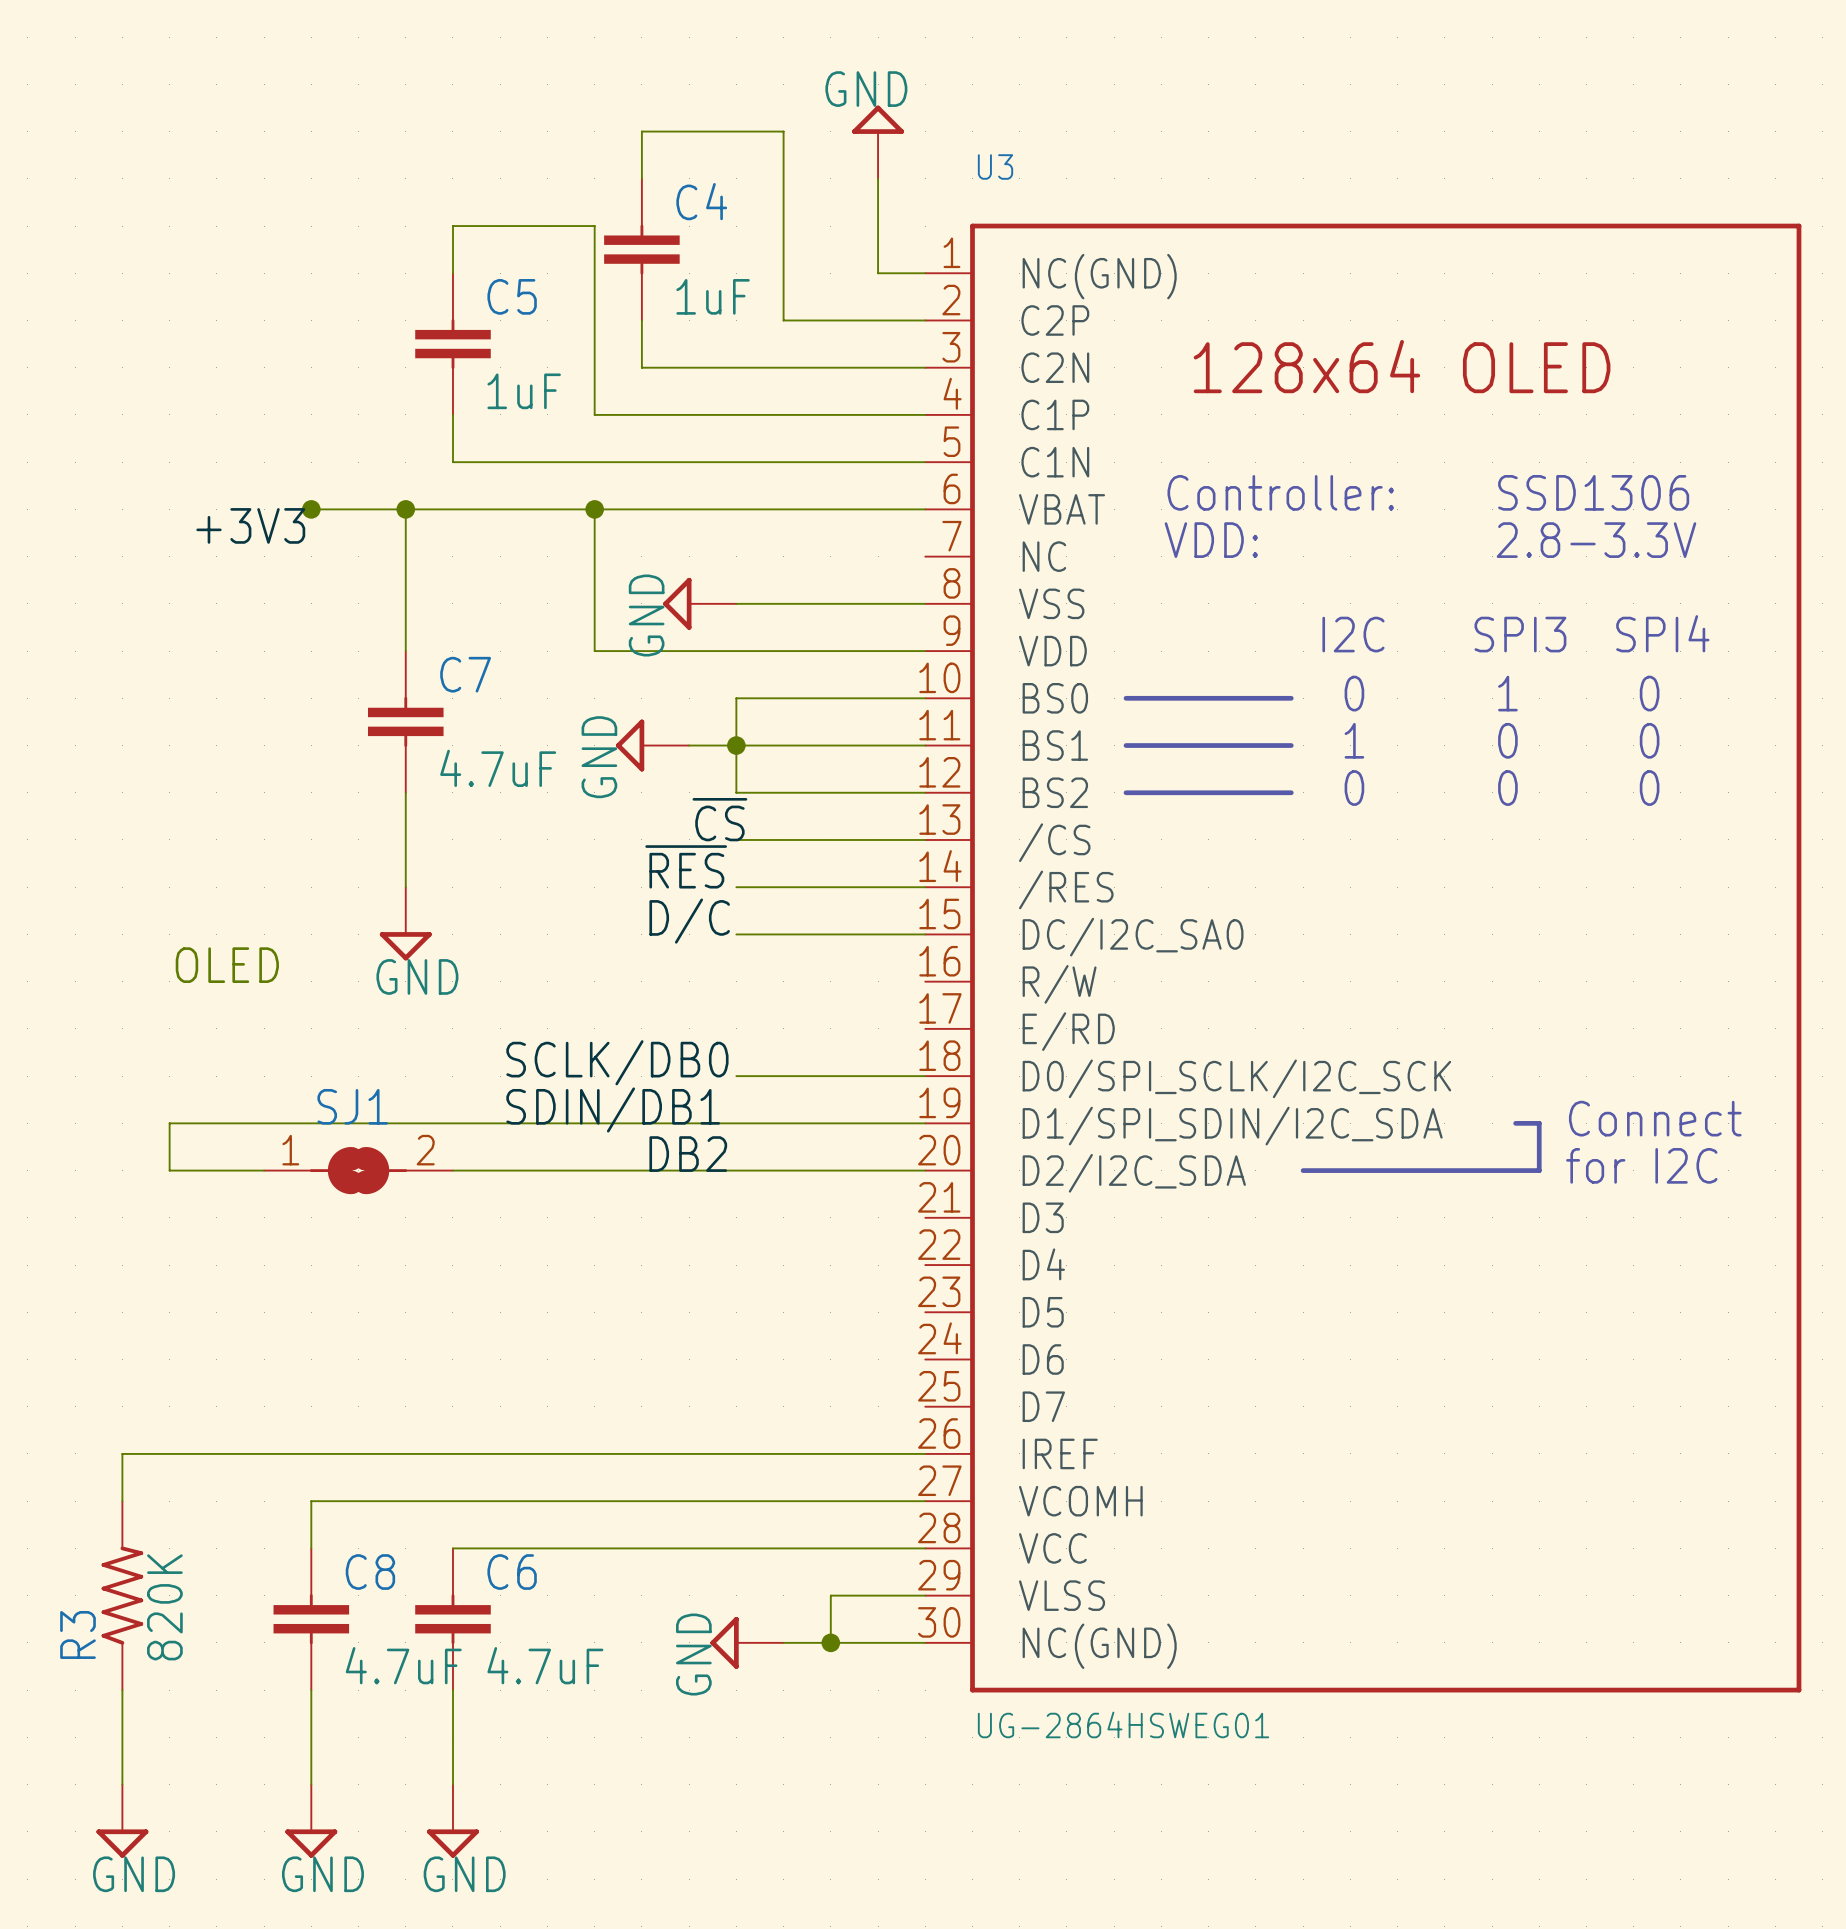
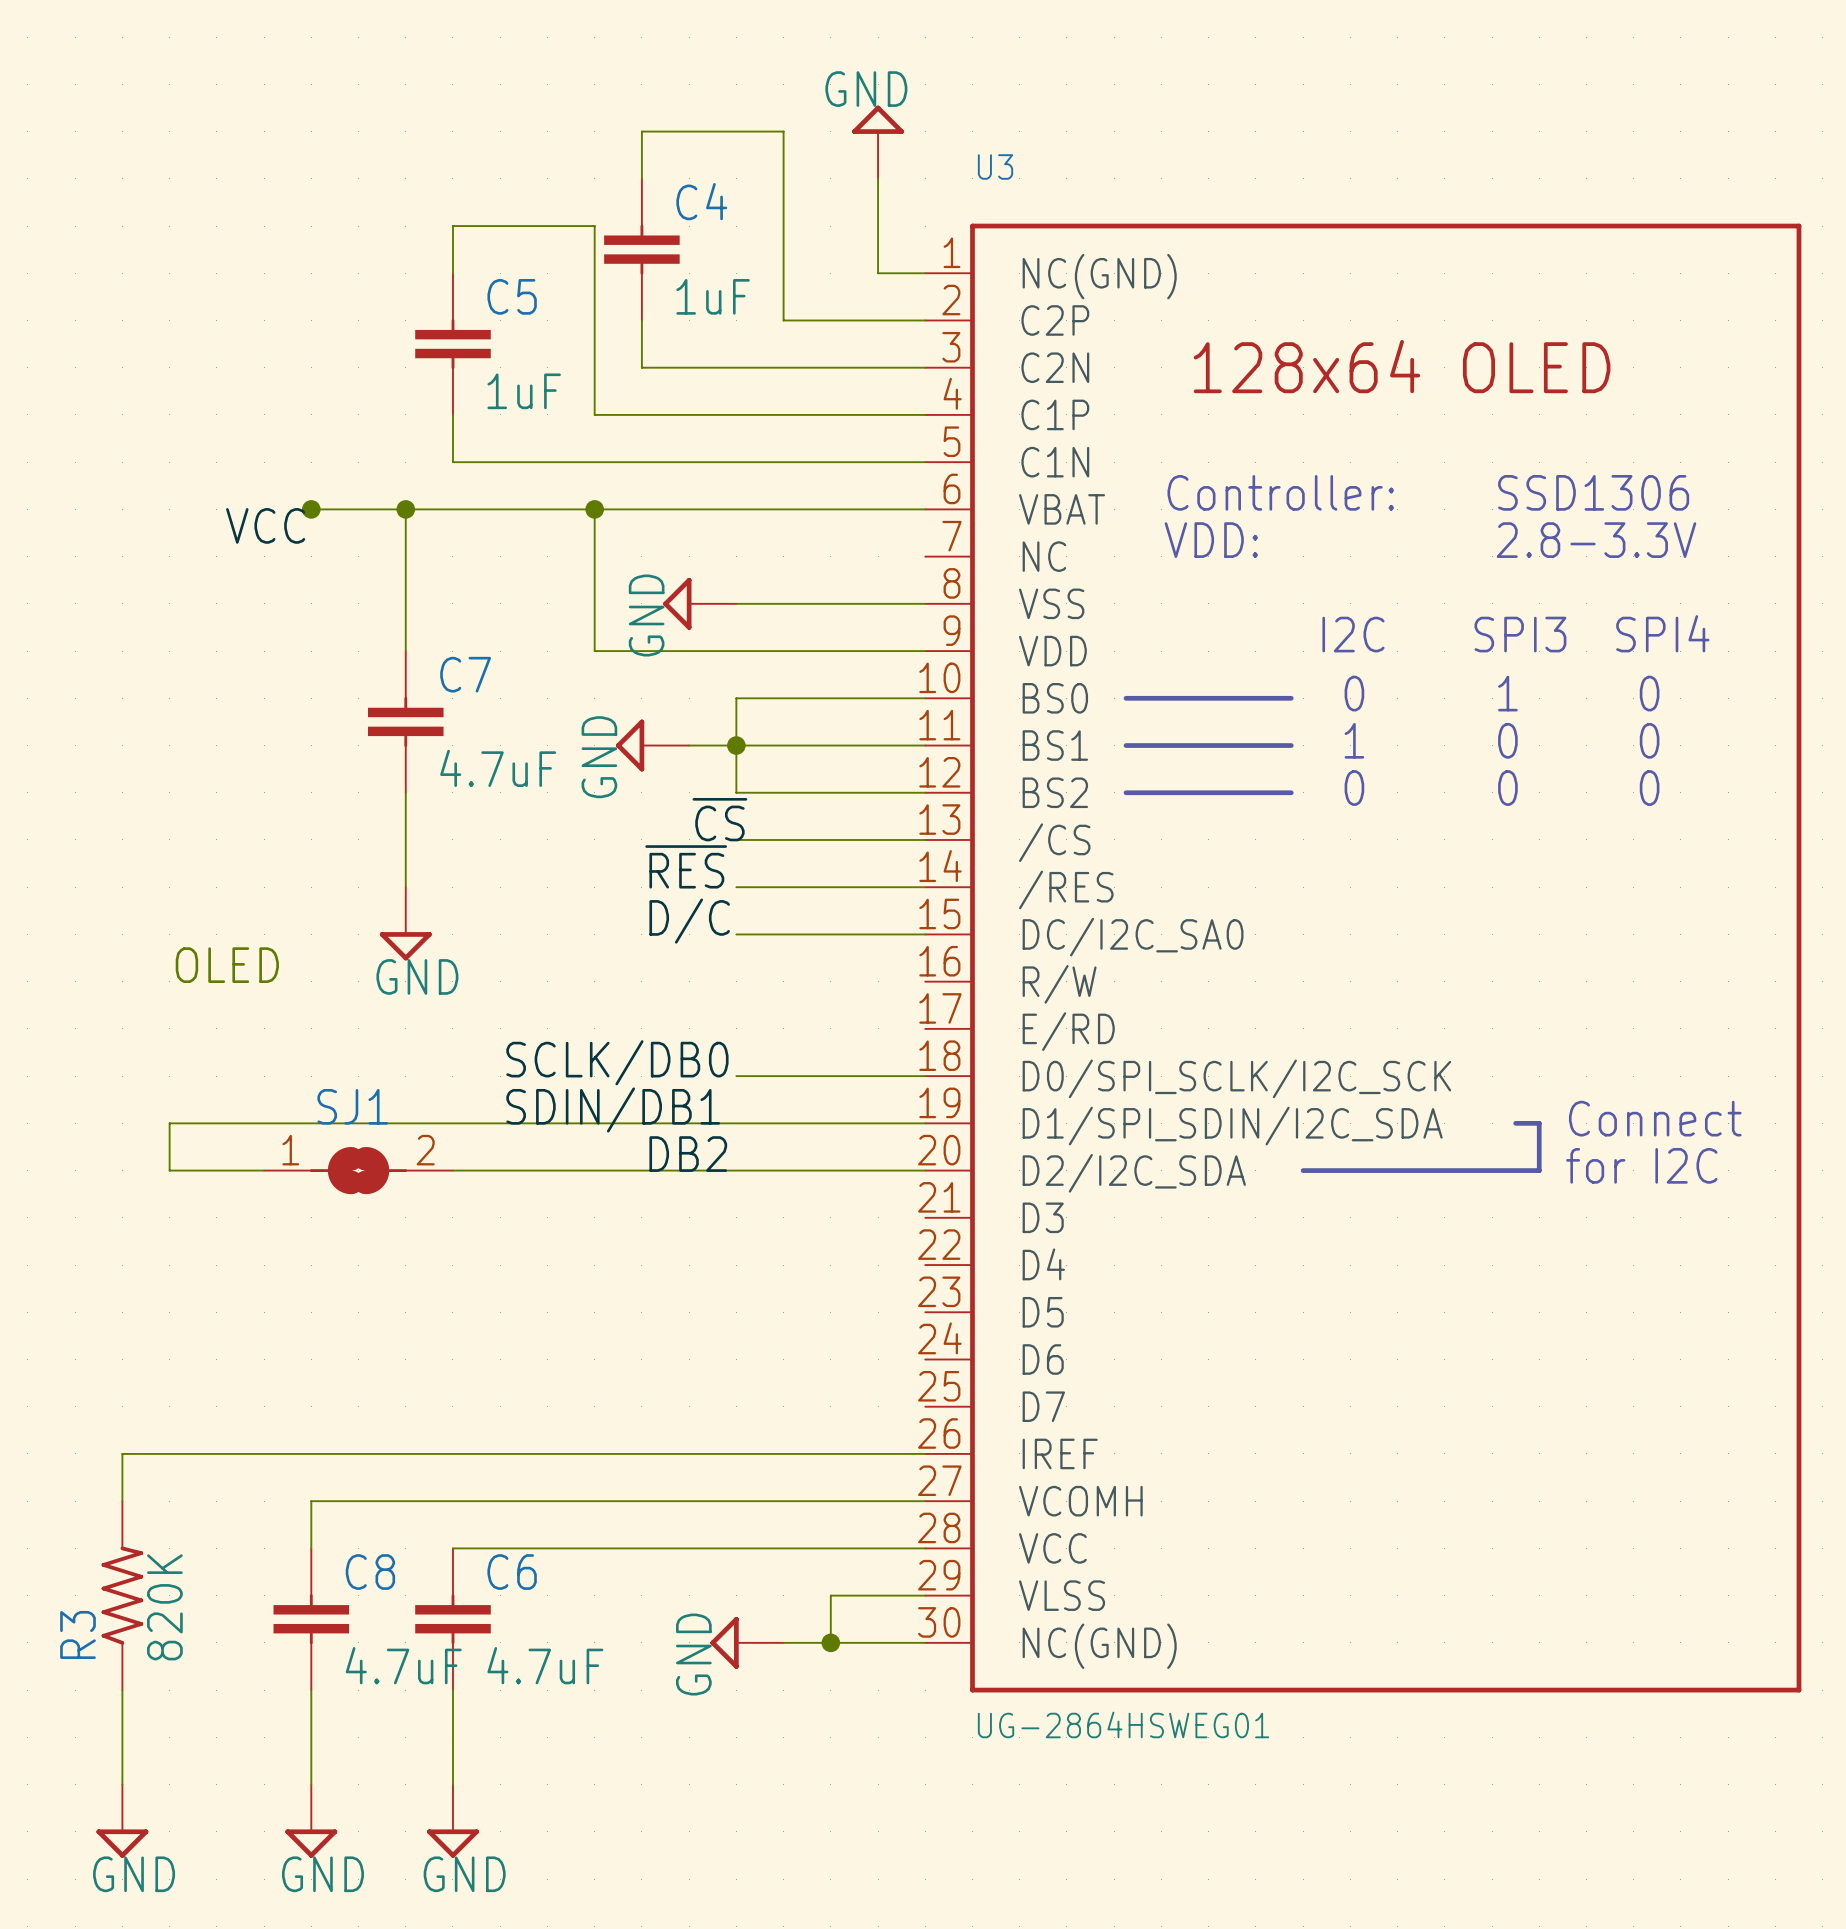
label: +3V3 (250, 525) -> VCC (265, 525)

